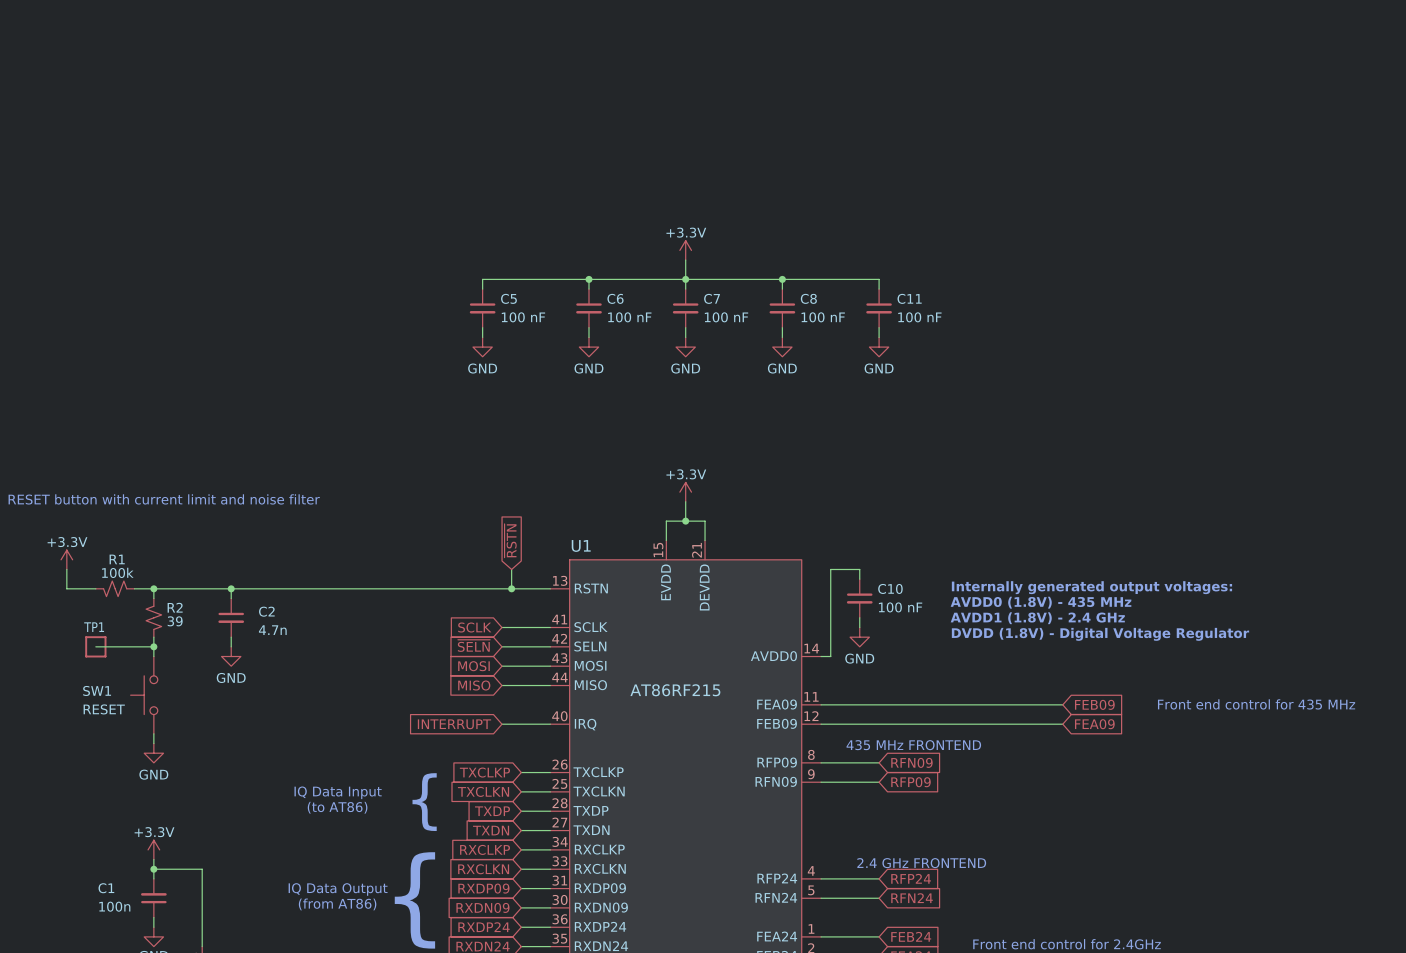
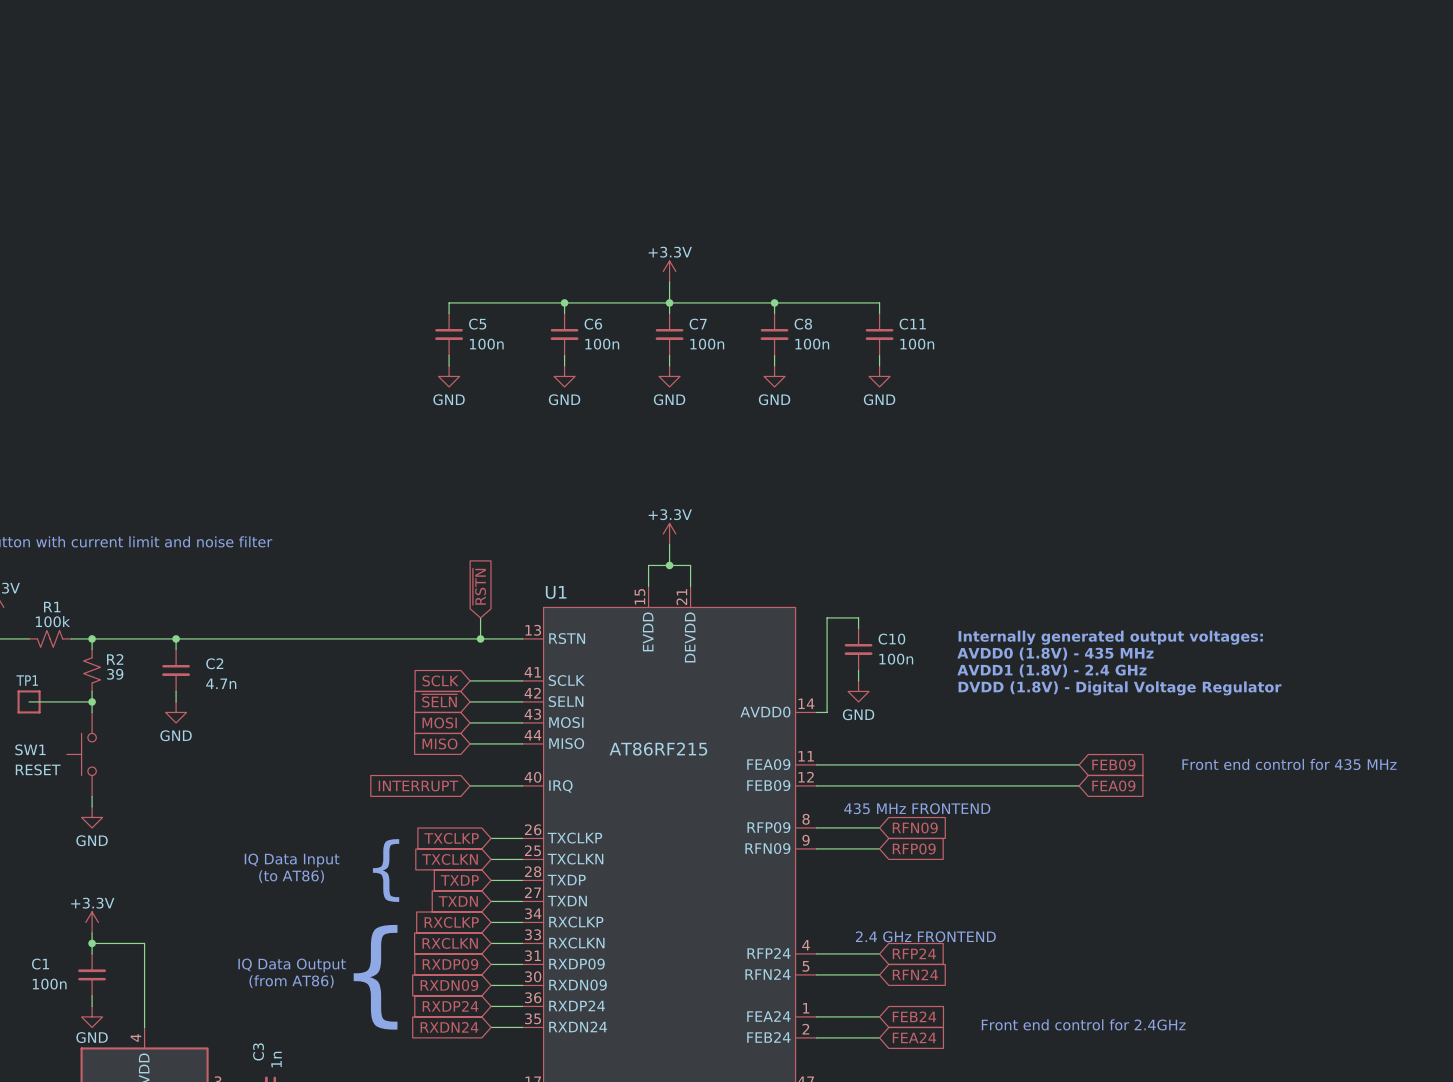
C5 value: 100 nF (523, 317) -> 100n (486, 344)
C6 value: 100 nF (629, 317) -> 100n (602, 344)
C7 value: 100 nF (726, 317) -> 100n (707, 344)
C8 value: 100 nF (823, 317) -> 100n (812, 344)
C11 value: 100 nF (919, 317) -> 100n (917, 344)
C10 value: 100 nF (900, 607) -> 100n (896, 659)

